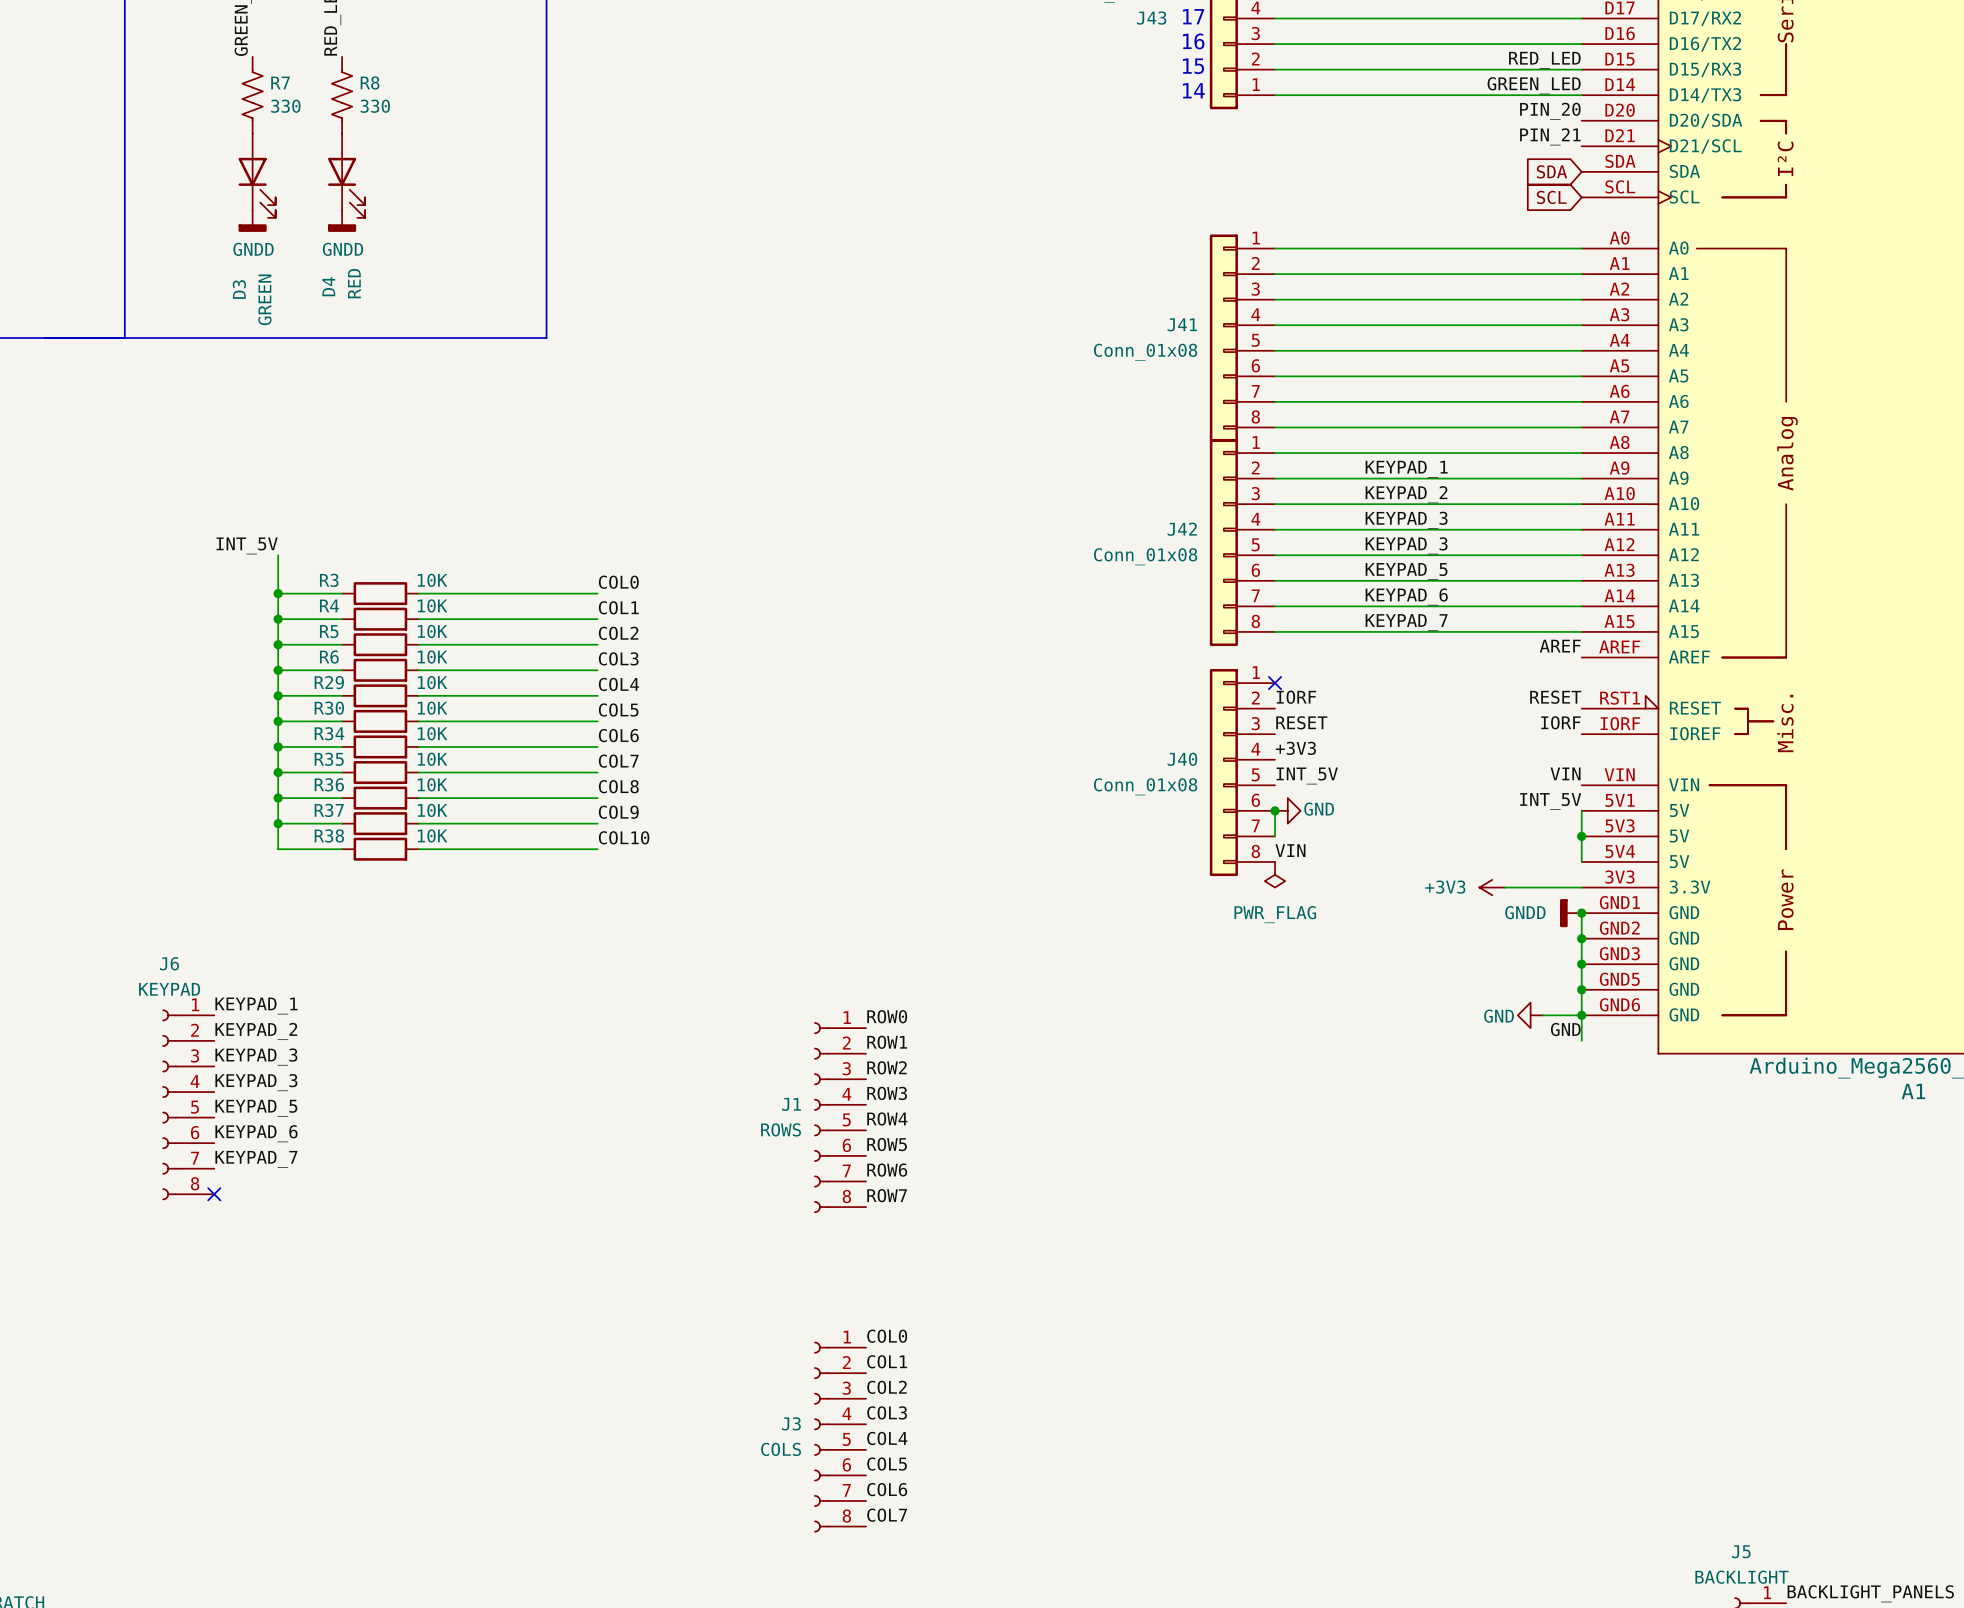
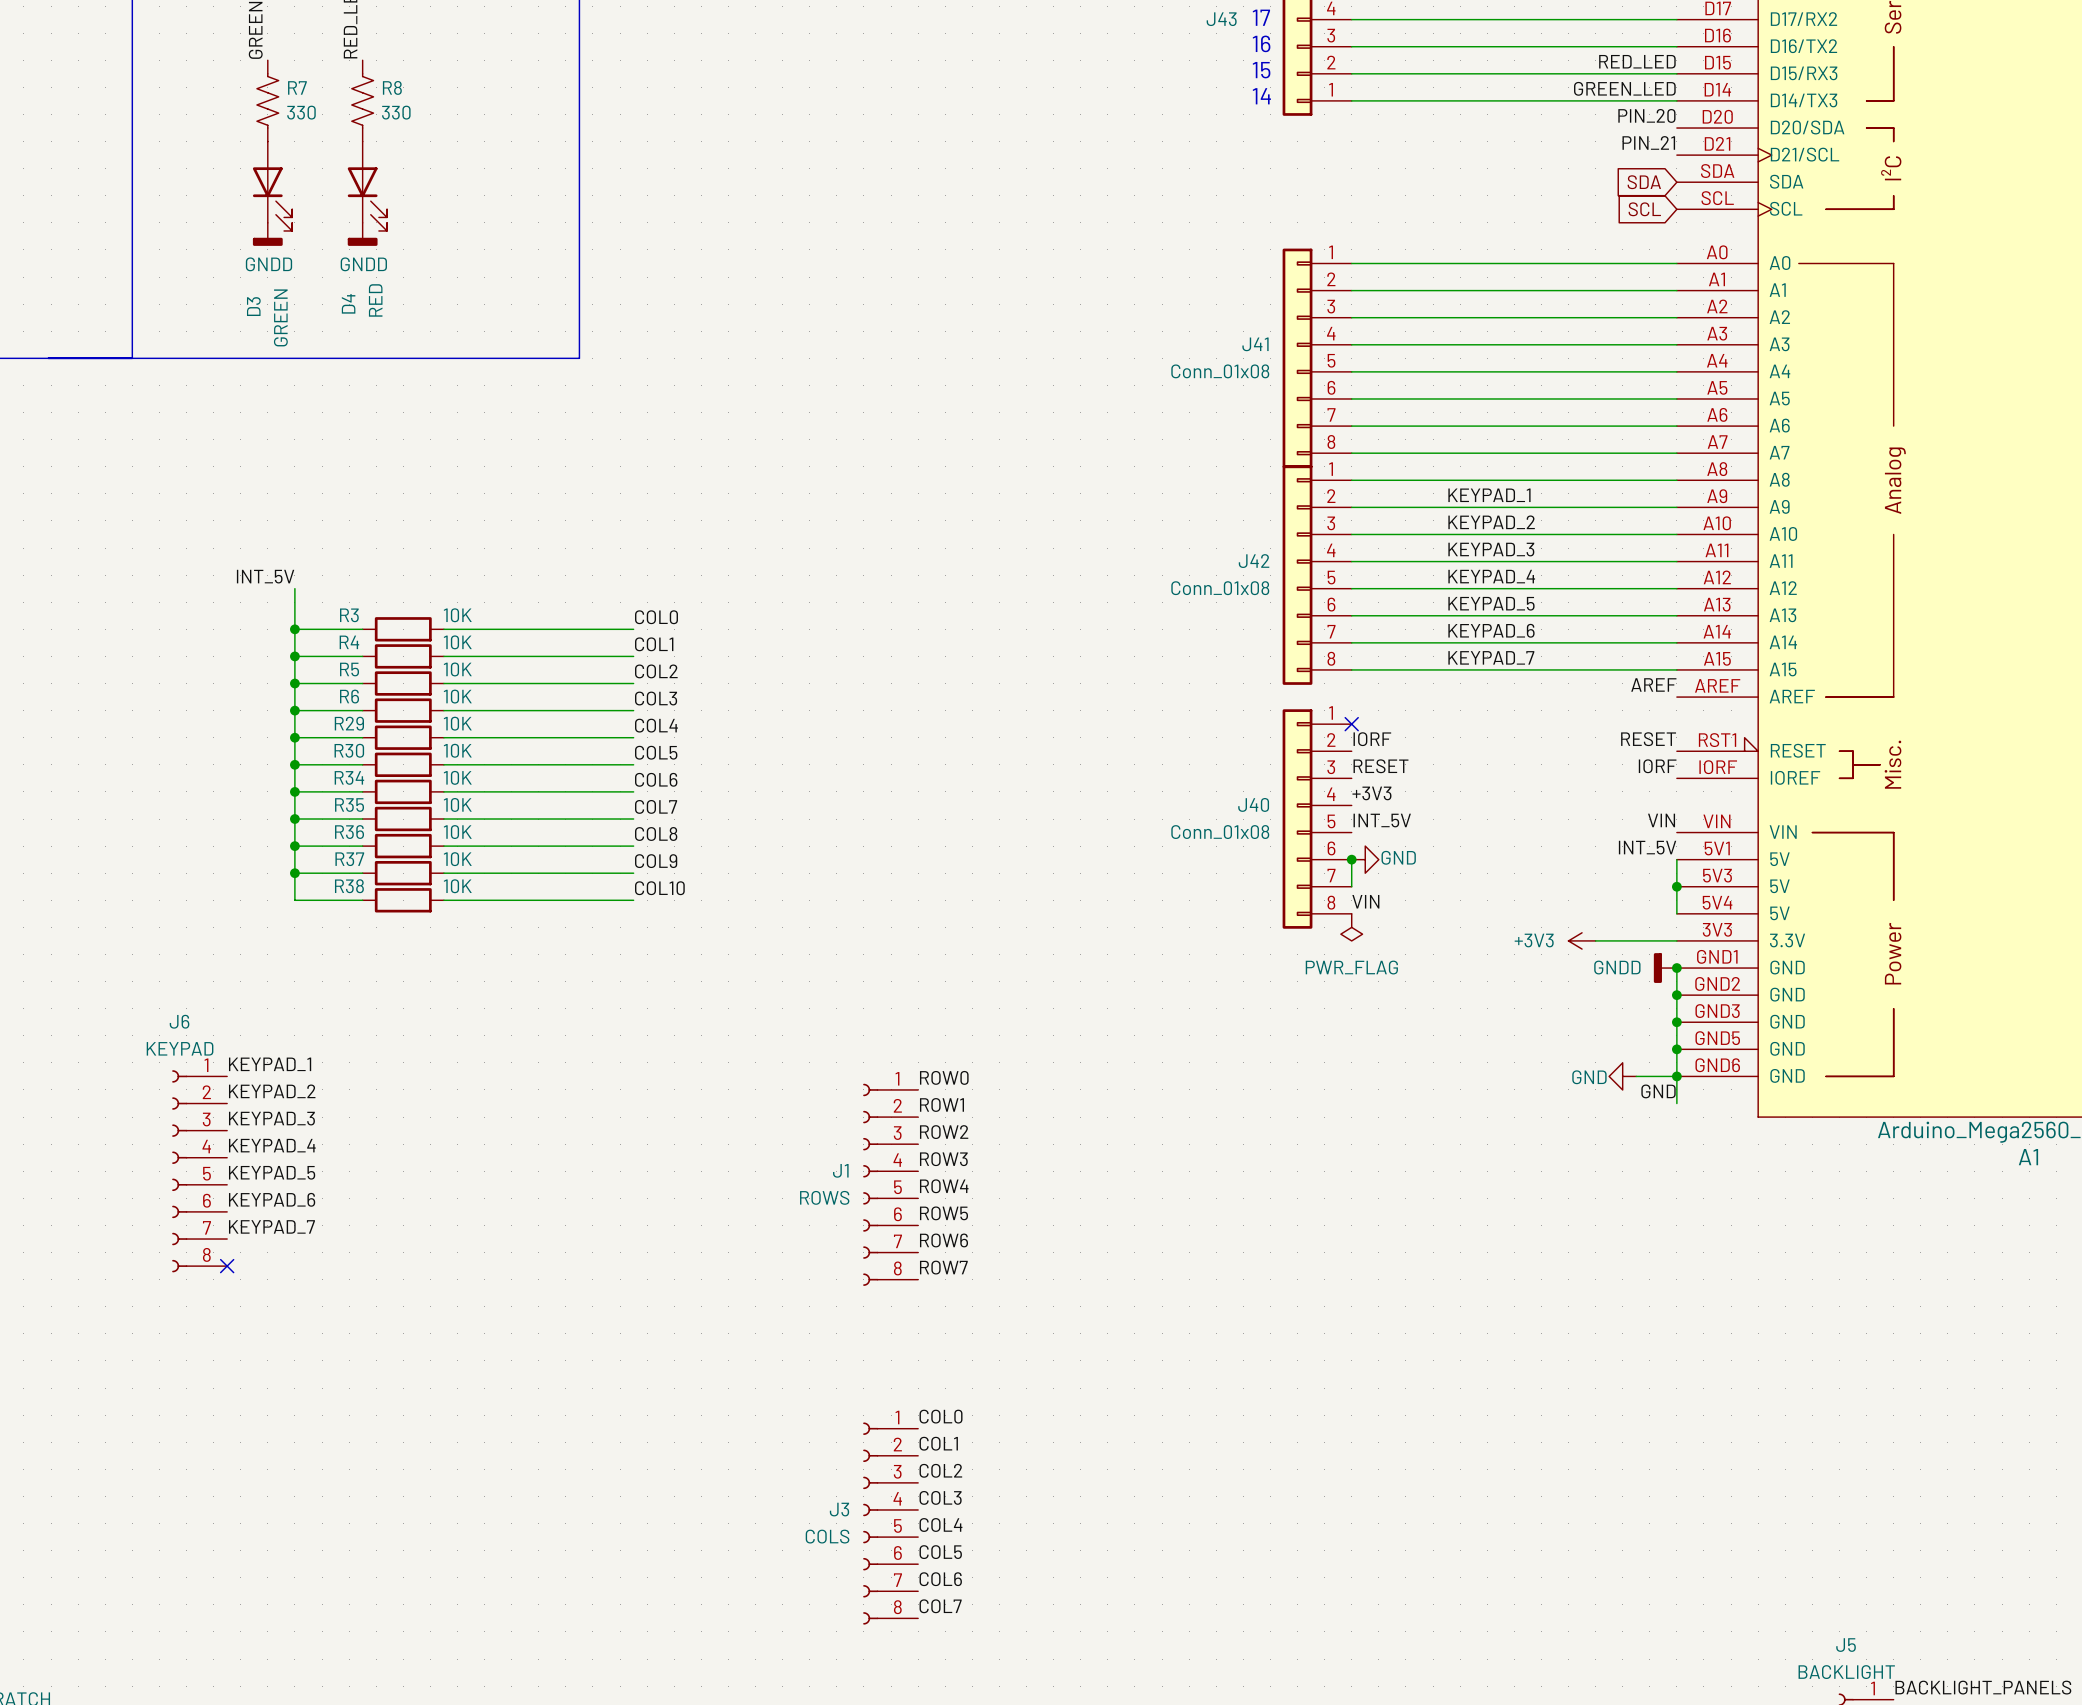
label: KEYPAD_3 (1406, 545) -> KEYPAD_4 (1491, 576)
label: KEYPAD_3 (256, 1082) -> KEYPAD_4 (272, 1145)

